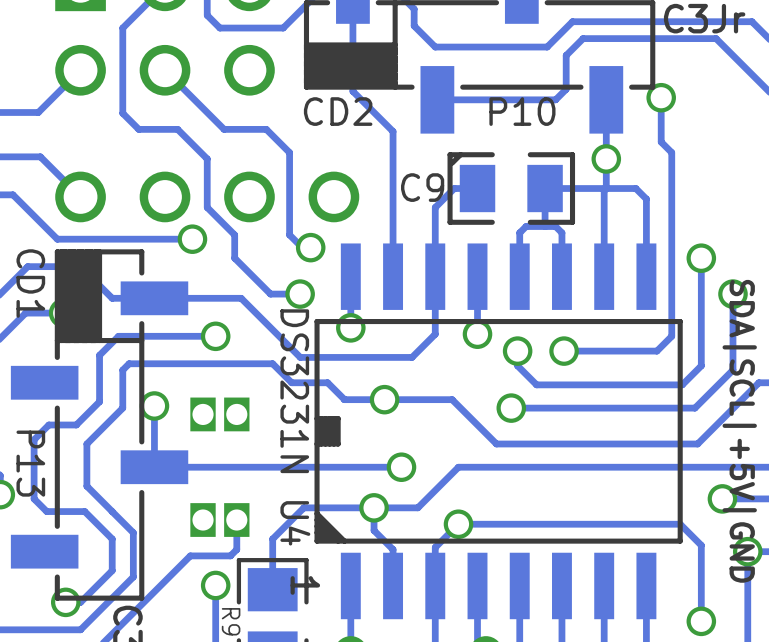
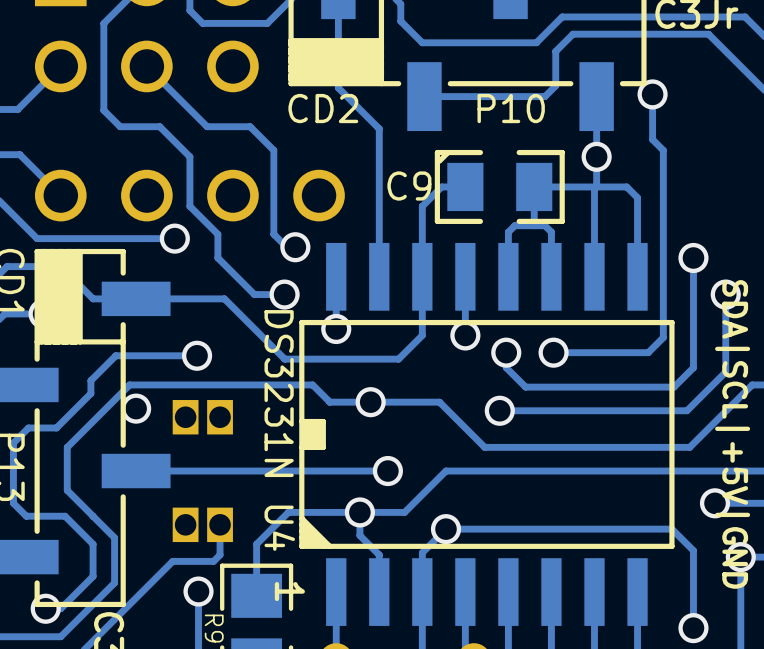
track: (215, 336) (118, 336) (99, 355) (99, 401) -> (197, 355) (115, 355) (90, 380) (90, 393) (80, 404)
via position: (215, 336) -> (197, 355)
track: (291, 382) (272, 363) (129, 363) (122, 370) (122, 408) -> (275, 384) (129, 384) (103, 410)
track: (154, 405) (154, 467) -> none

